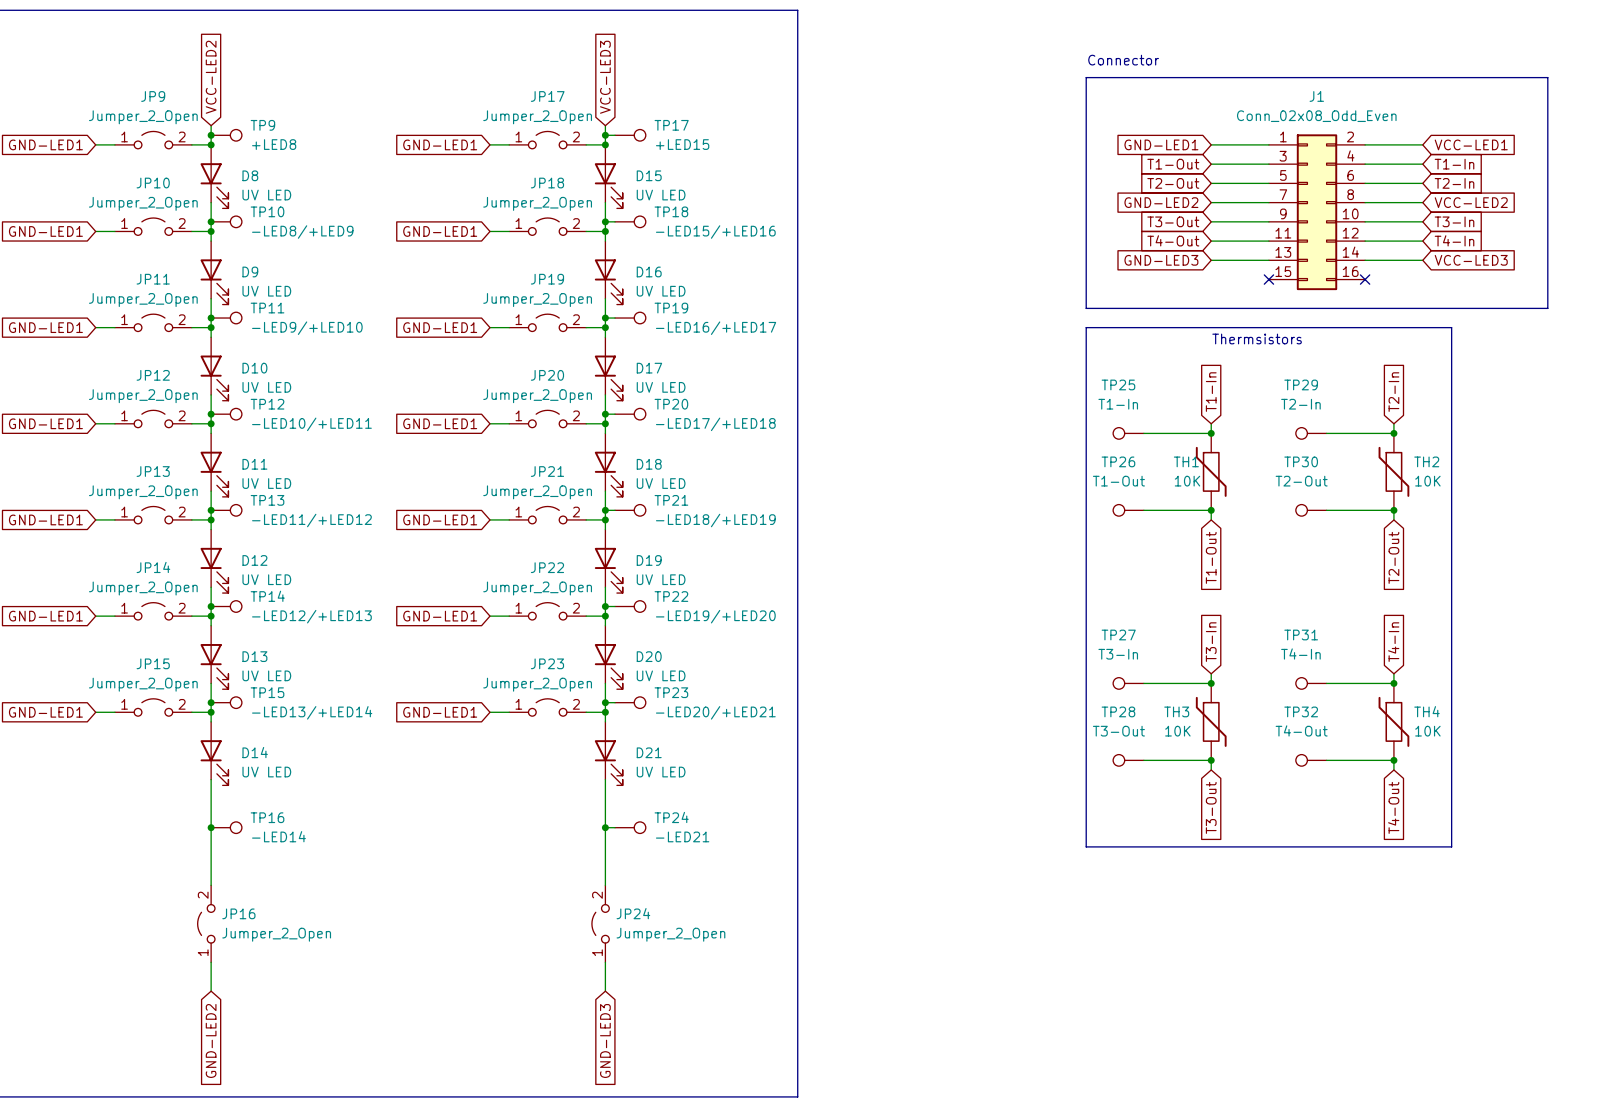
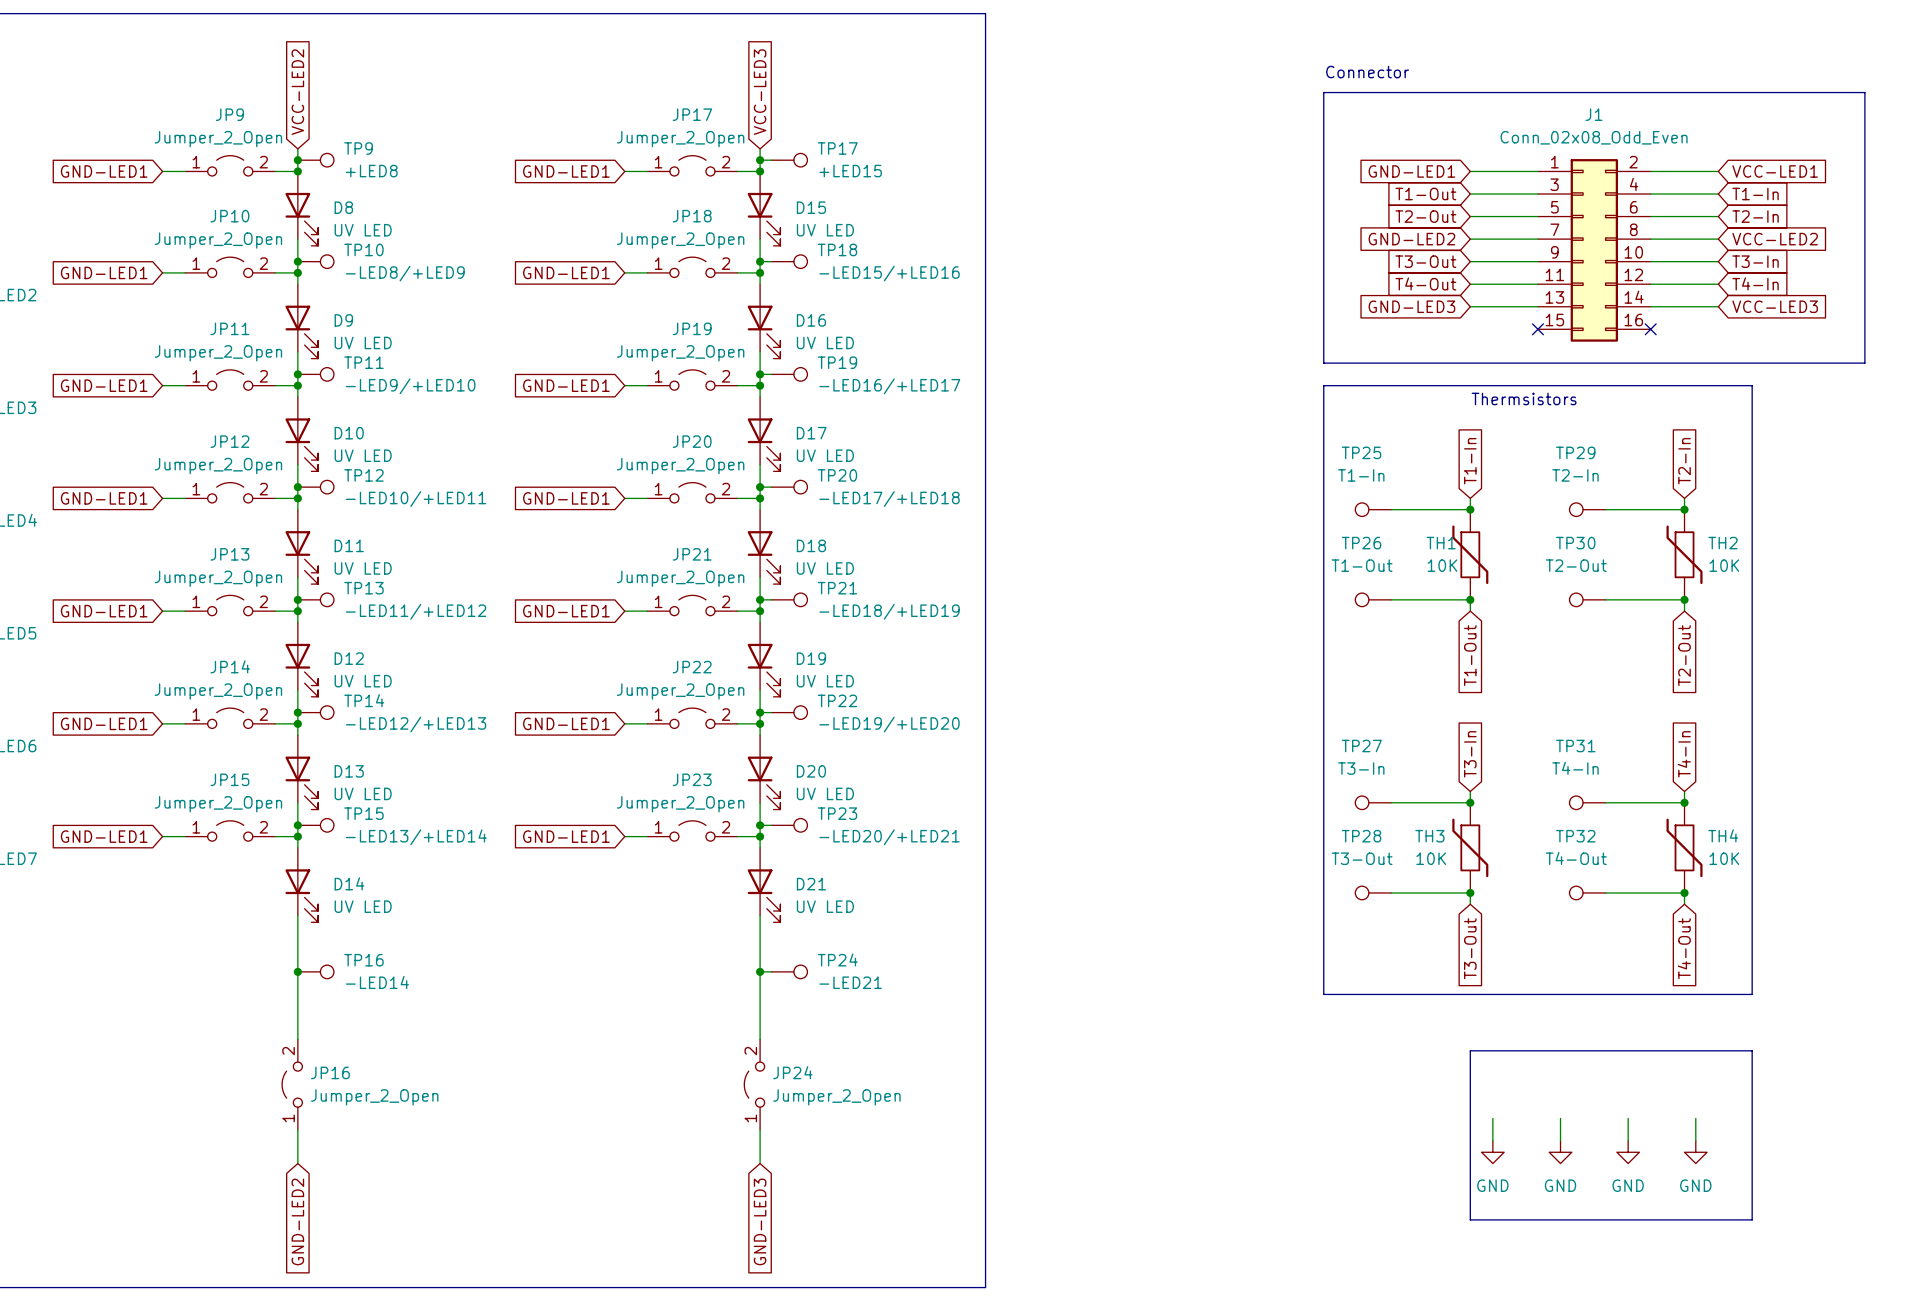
line: none -> (1470, 1050) (1470, 1219) (1752, 1219) (1752, 1050) (1470, 1050)
wire: none -> (1492, 1118) (1492, 1141)
wire: none -> (1560, 1118) (1560, 1141)
wire: none -> (1628, 1118) (1628, 1141)
wire: none -> (1695, 1118) (1695, 1141)
power symbol: none -> GND (1492, 1152)
power symbol: none -> GND (1560, 1152)
power symbol: none -> GND (1628, 1152)
power symbol: none -> GND (1695, 1152)

